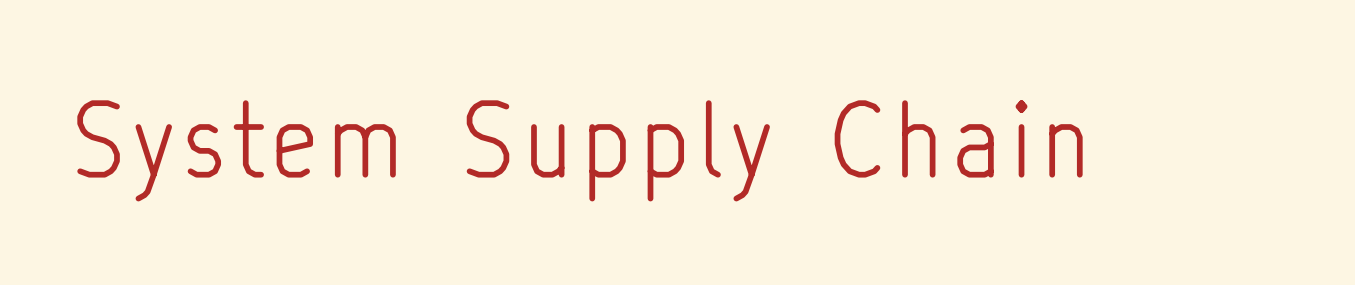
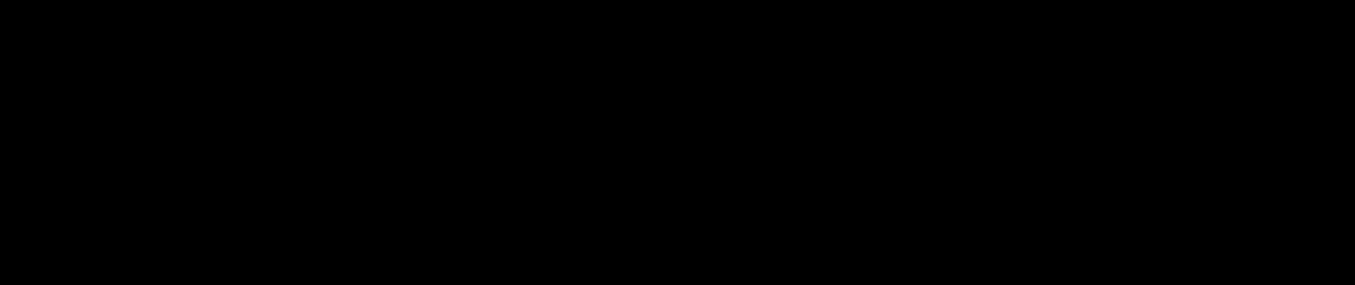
text: System Supply Chain (579, 150) -> none

